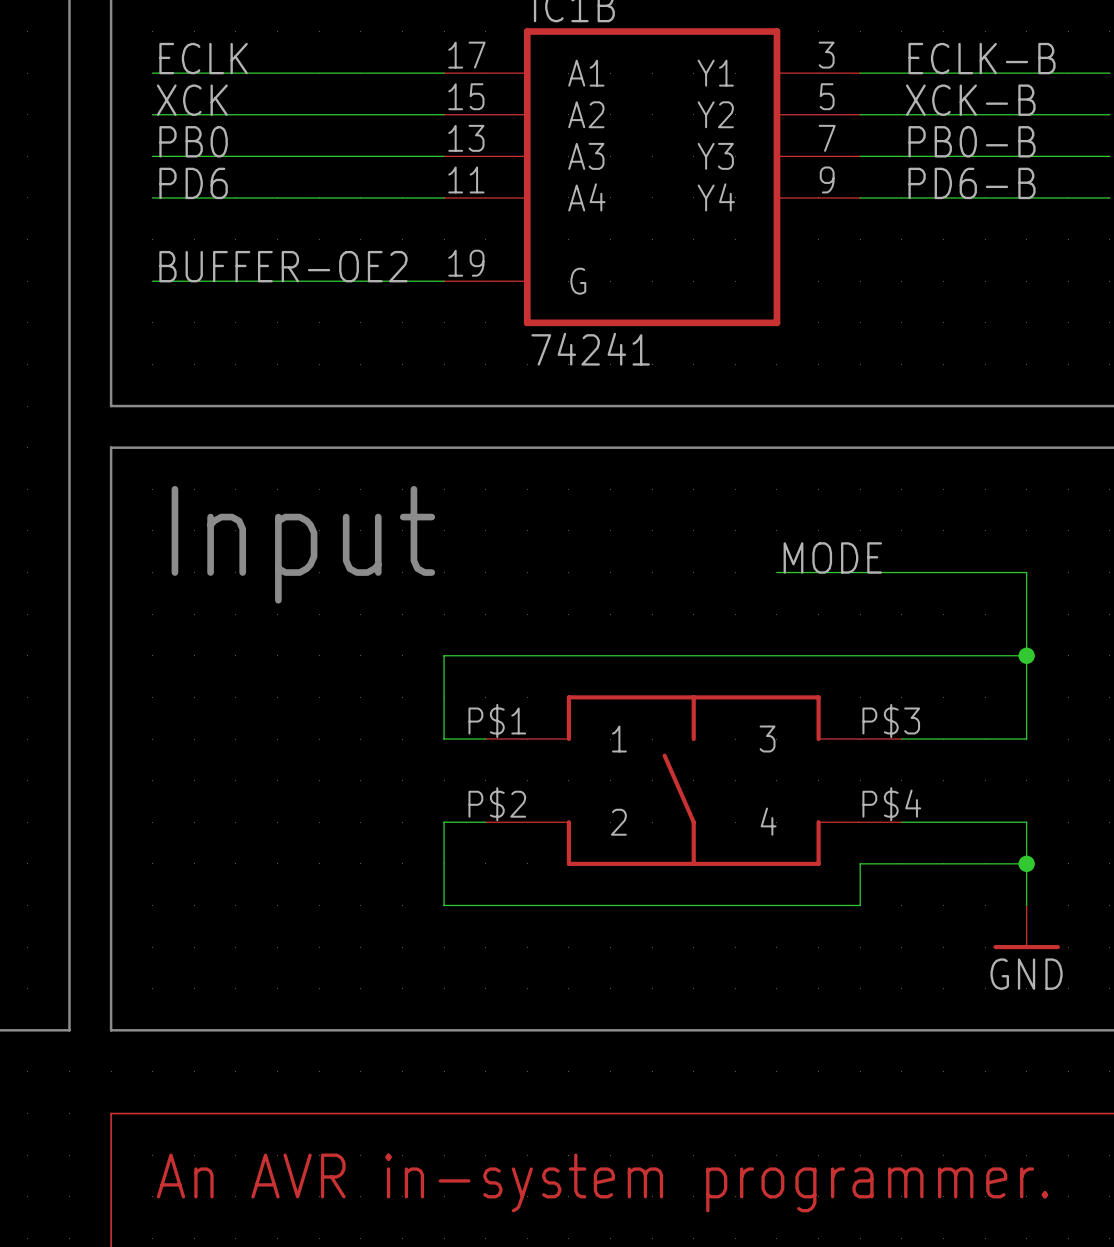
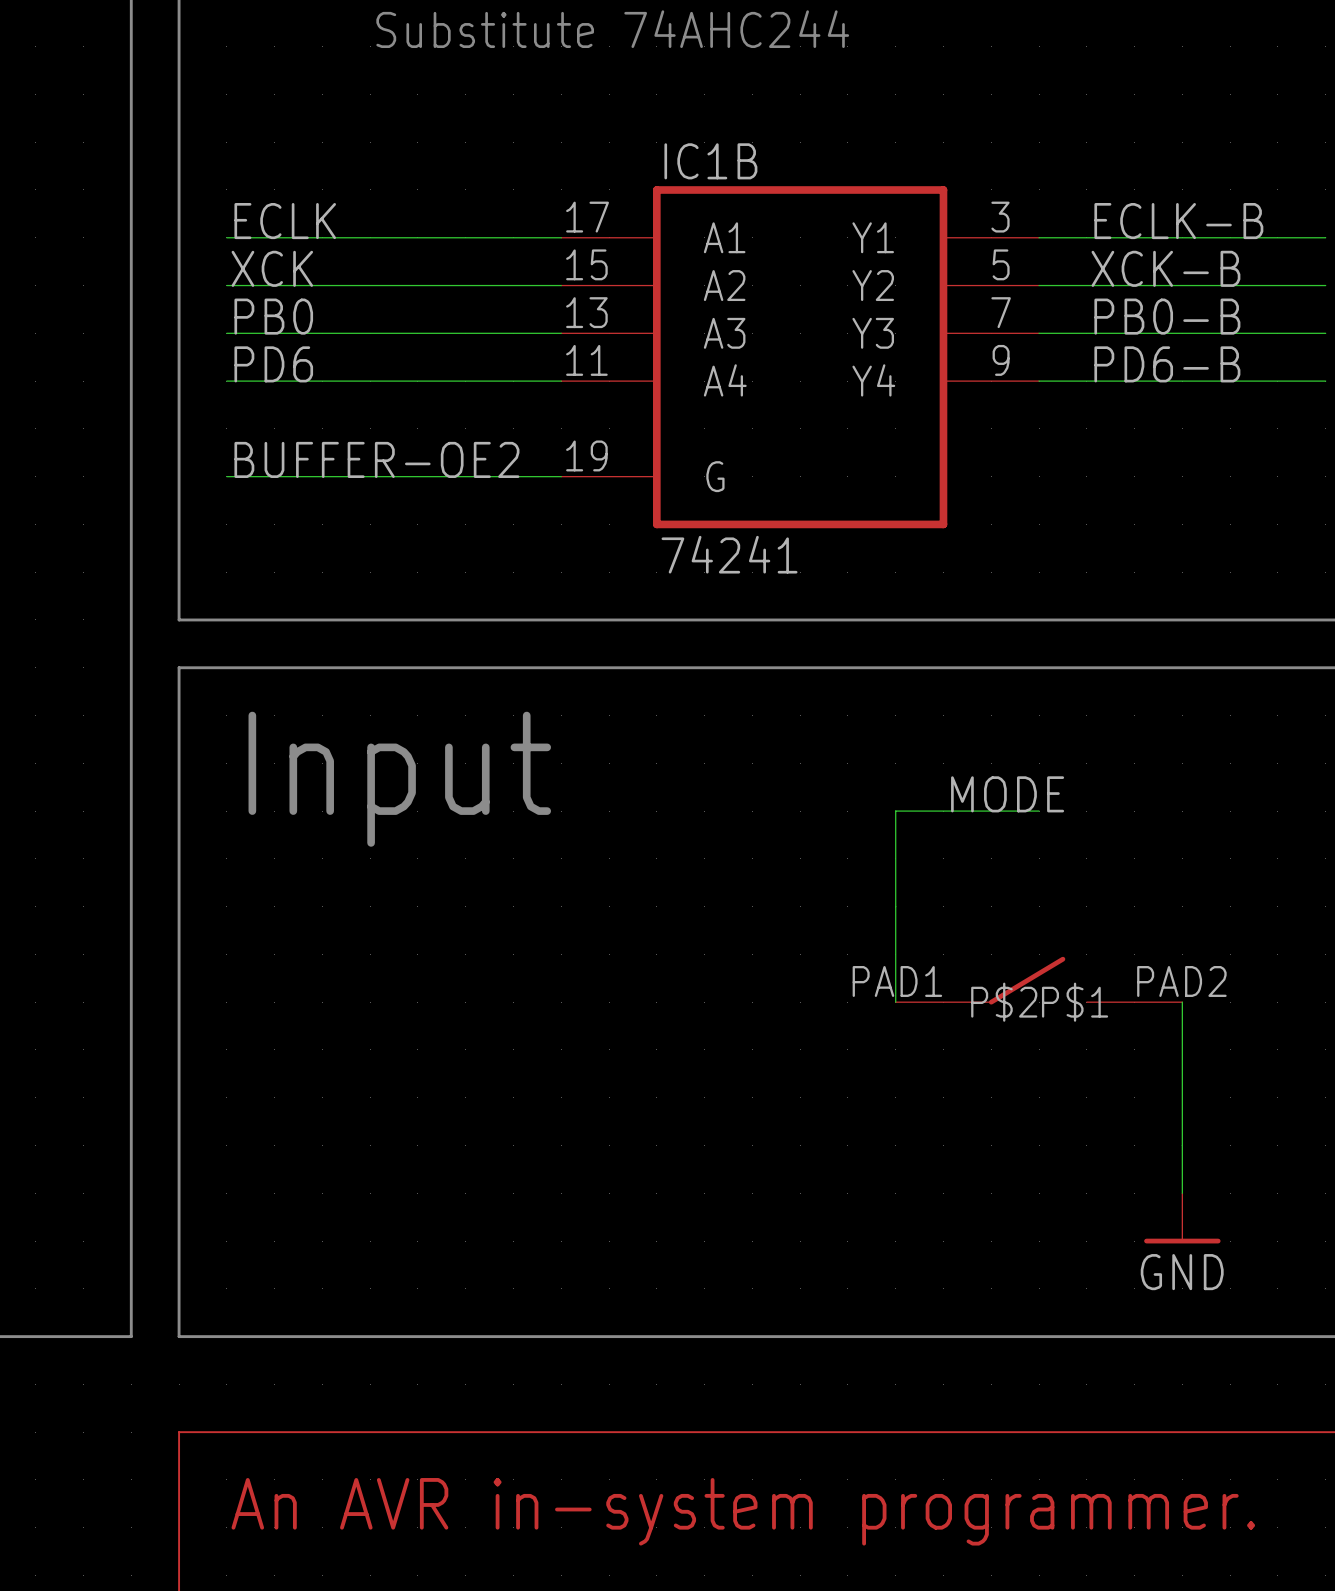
wire: none -> (943, 811) (895, 811) (895, 1002)
wire: (860, 572) (1026, 572) (1026, 739) (901, 739) -> none
wire: (1026, 655) (444, 655) (444, 739) (485, 739) -> none
junction: (1026, 655) -> none
part: none -> (1039, 980)
wire: none -> (1182, 1002) (1182, 1193)
part: (693, 780) -> none
wire: (485, 822) (444, 822) (444, 905) (860, 905) (860, 863) (1026, 863) -> none
wire: (901, 822) (1026, 822) (1026, 905) -> none
junction: (1026, 863) -> none
power symbol position: GND (1026, 927) -> GND (1182, 1218)

